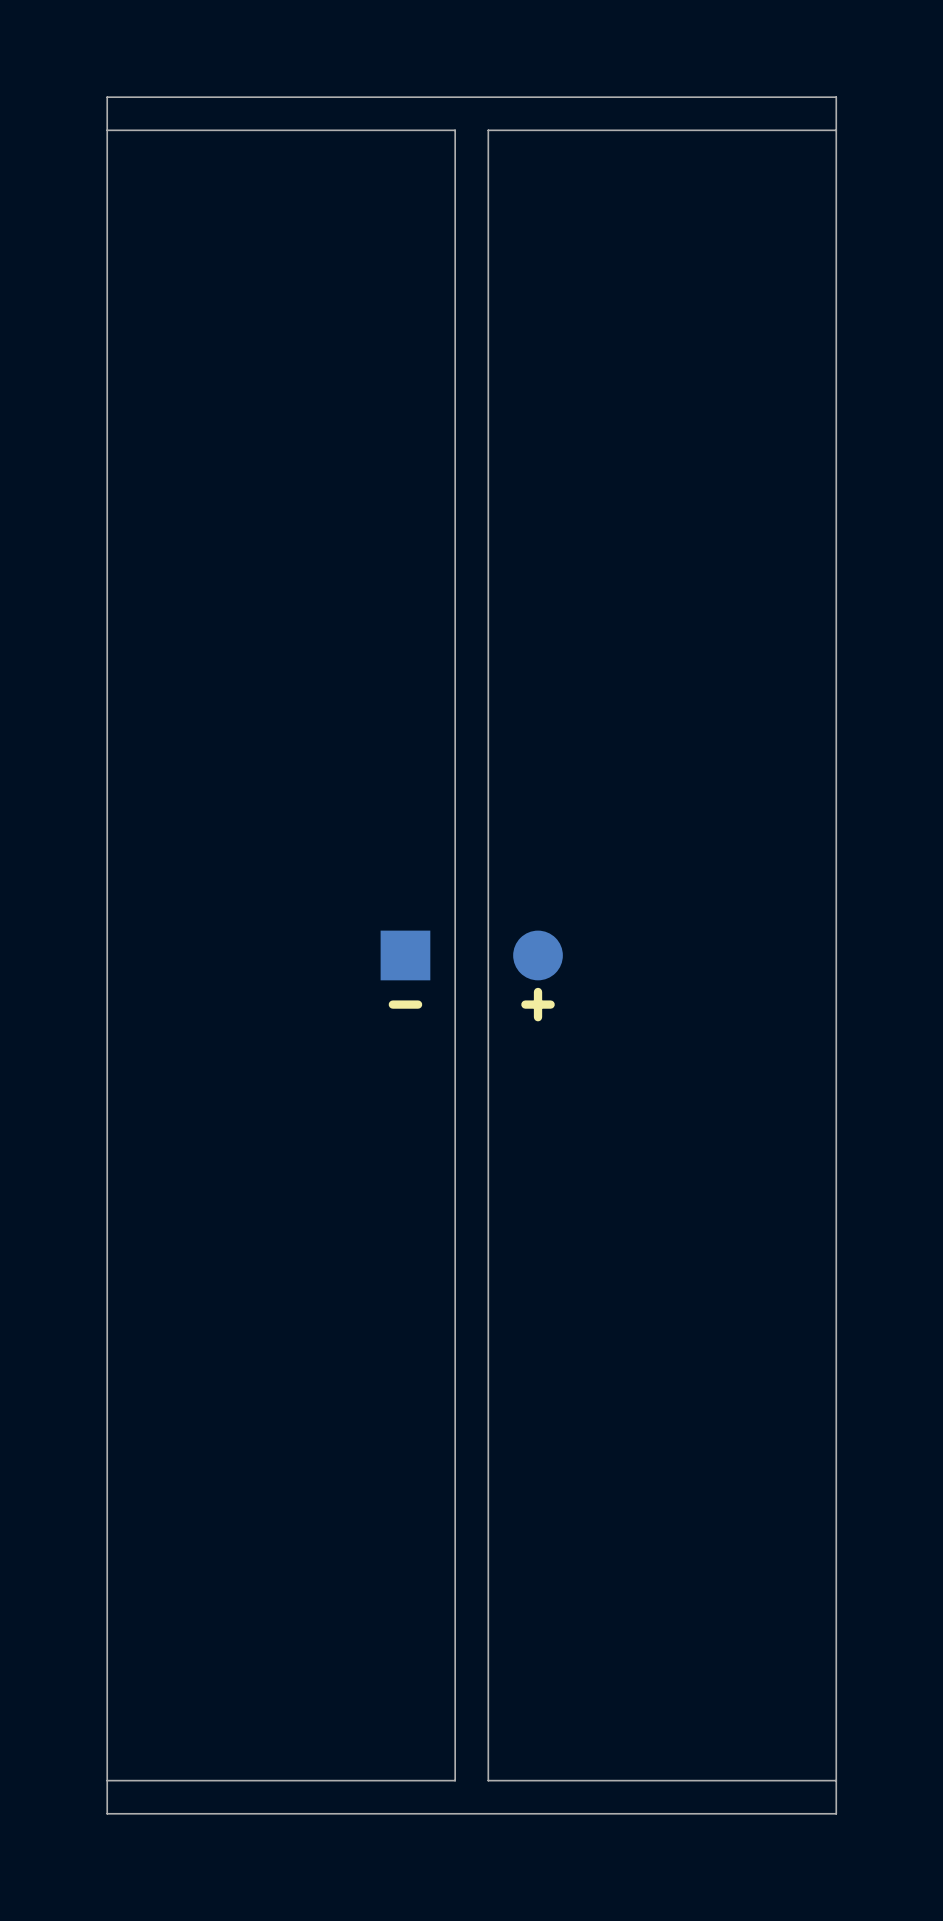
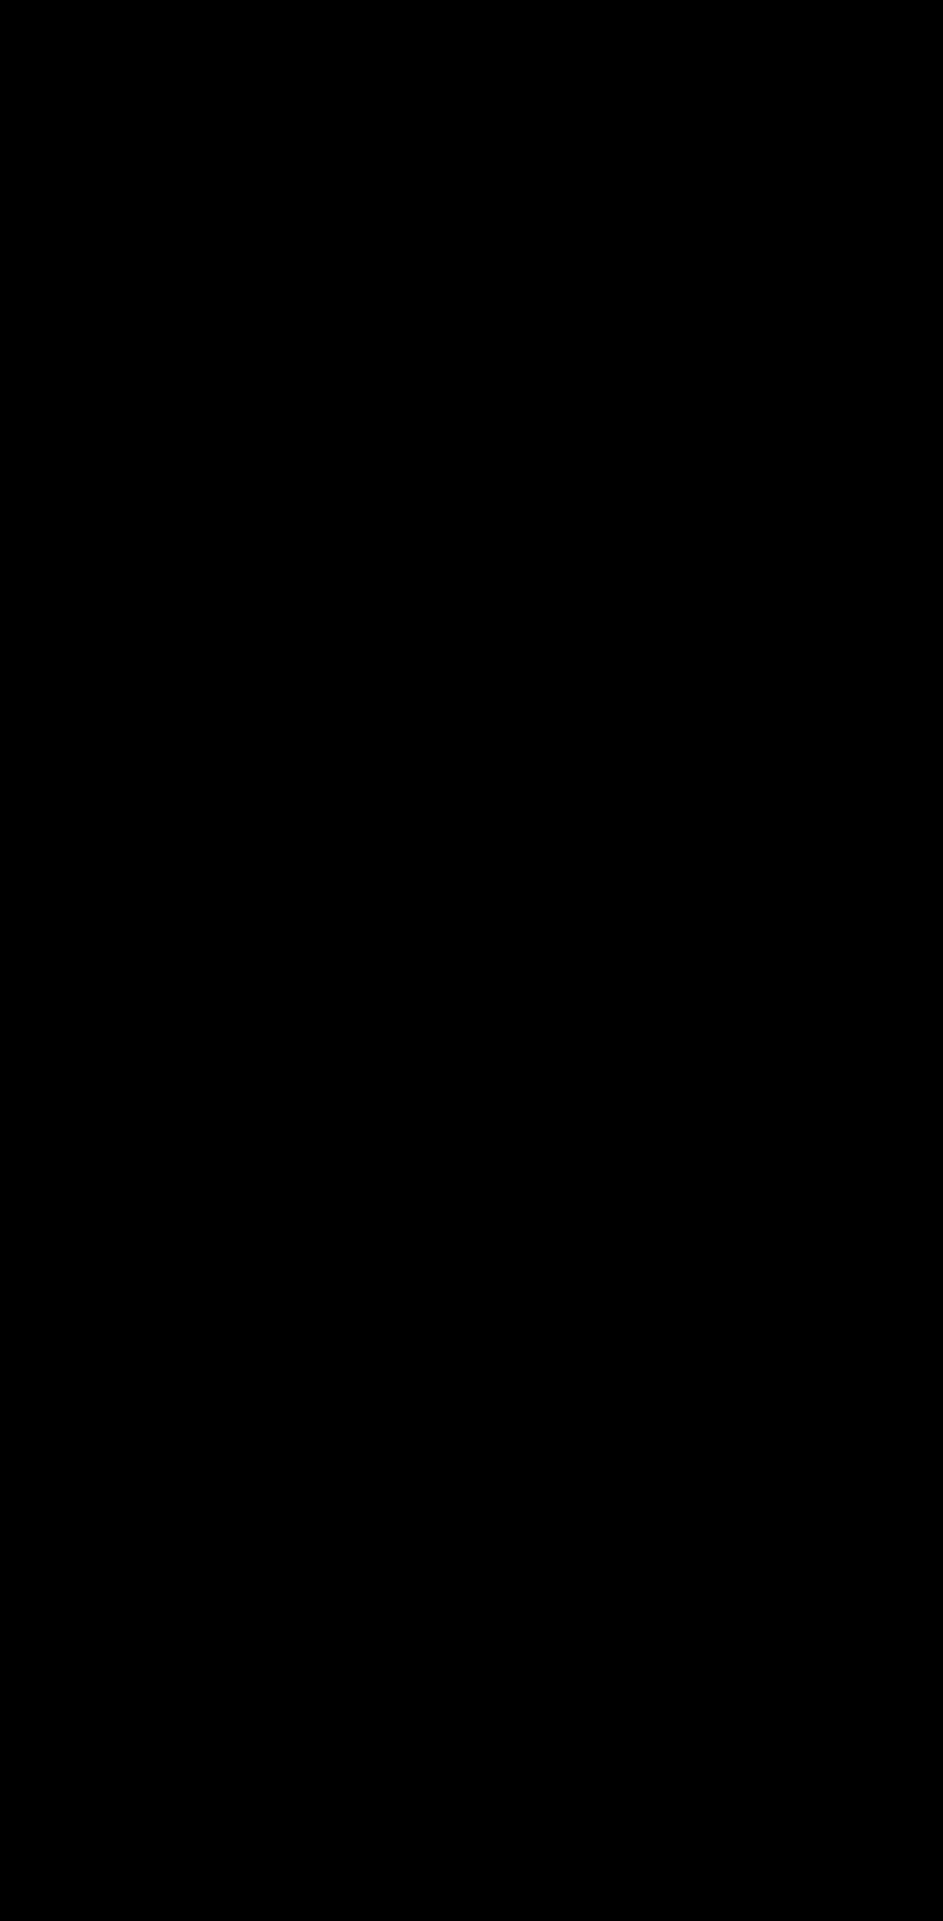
part: (471, 955) -> none

